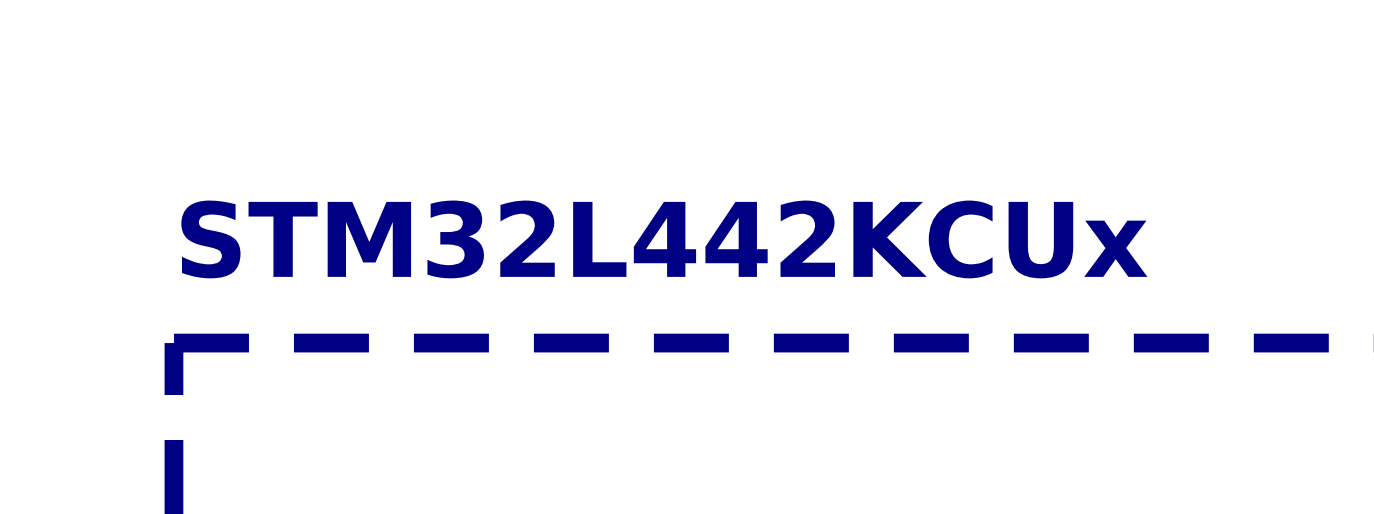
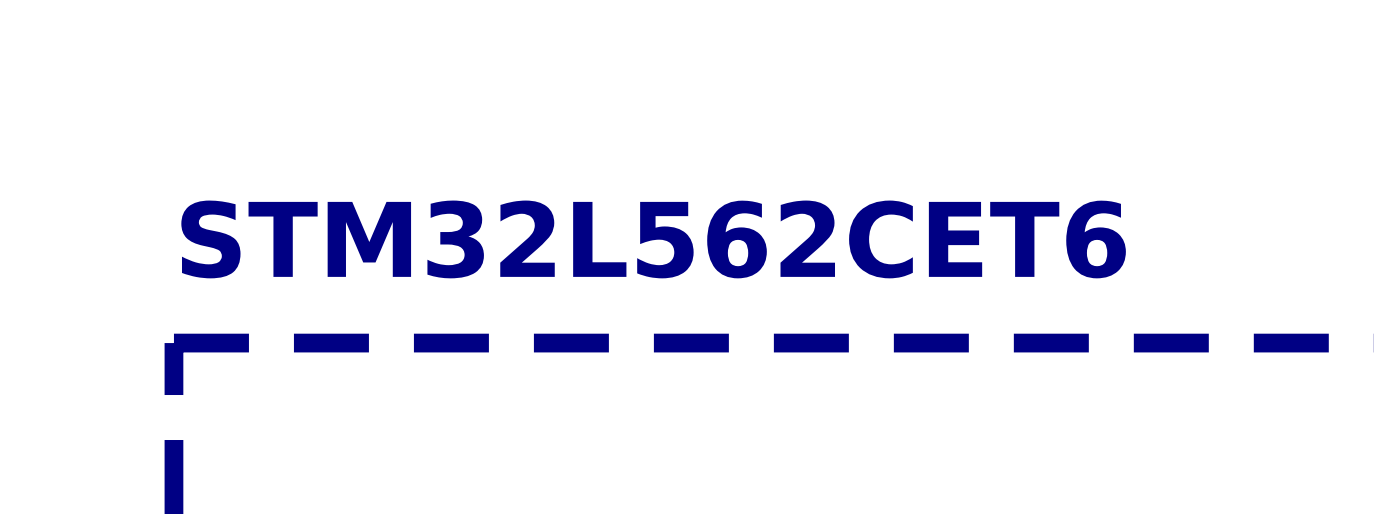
text: STM32L442KCUx (664, 239) -> STM32L562CET6 (653, 239)

